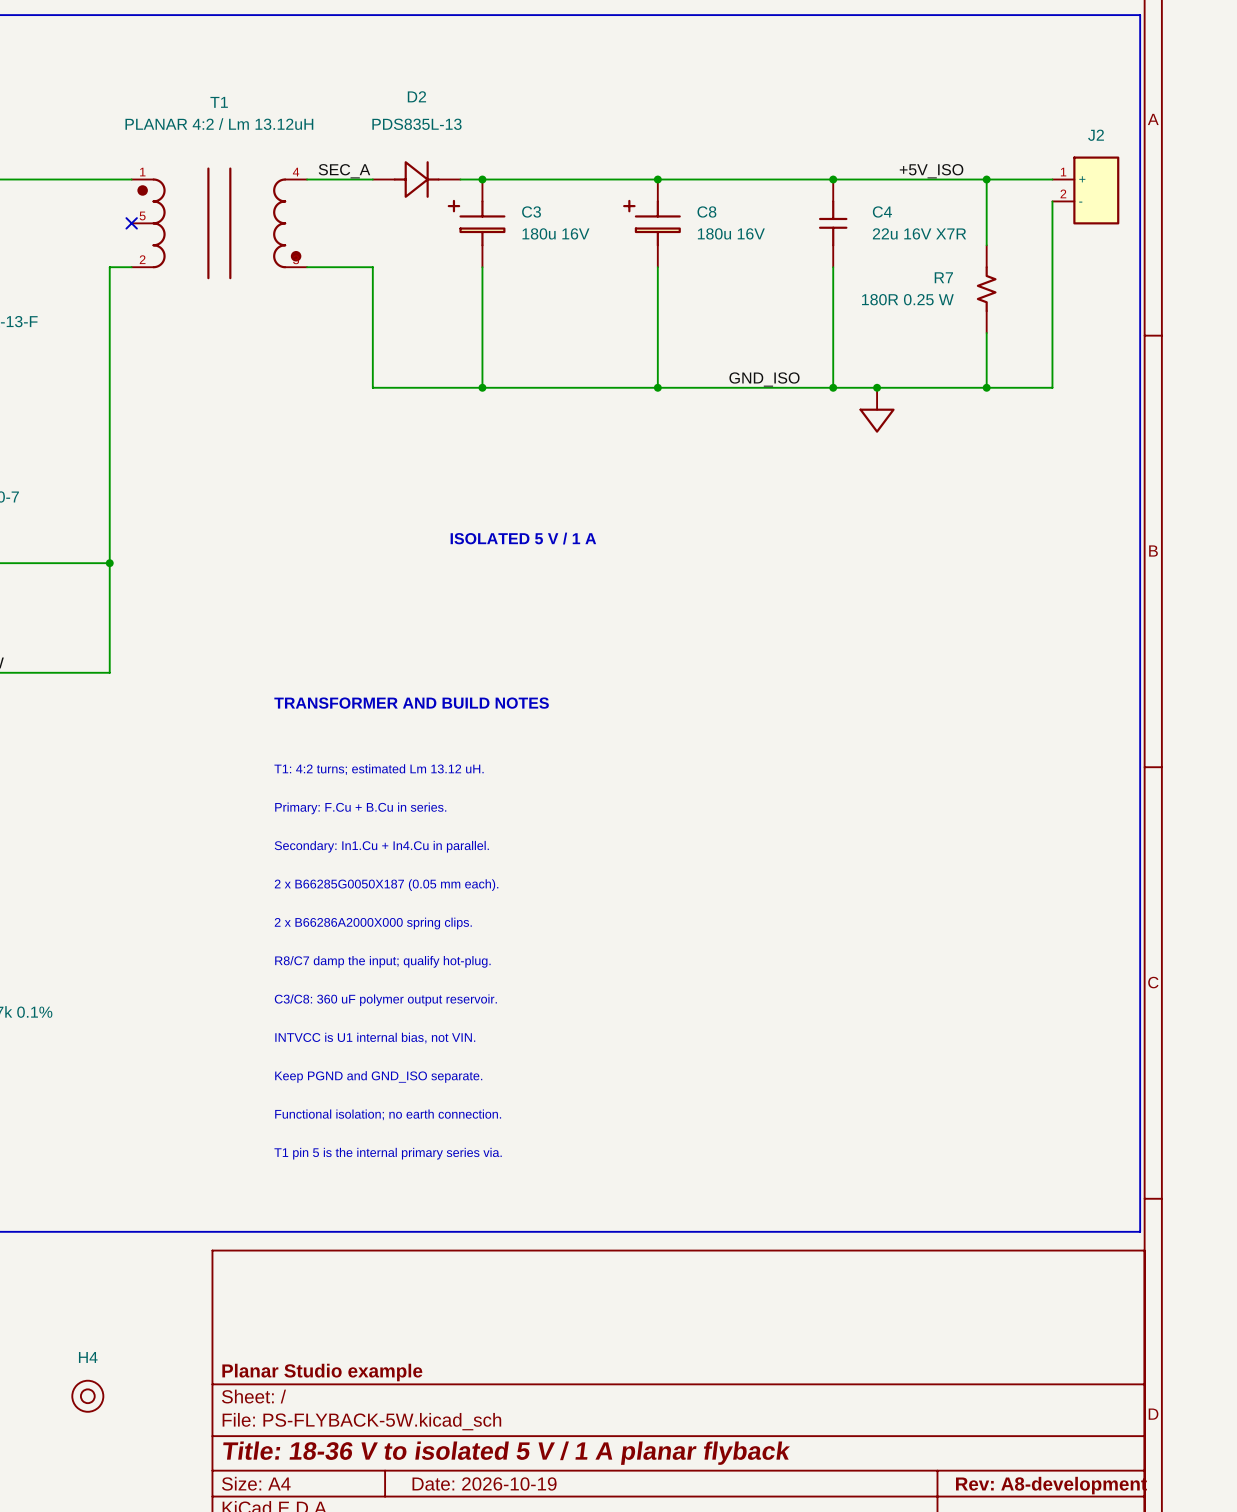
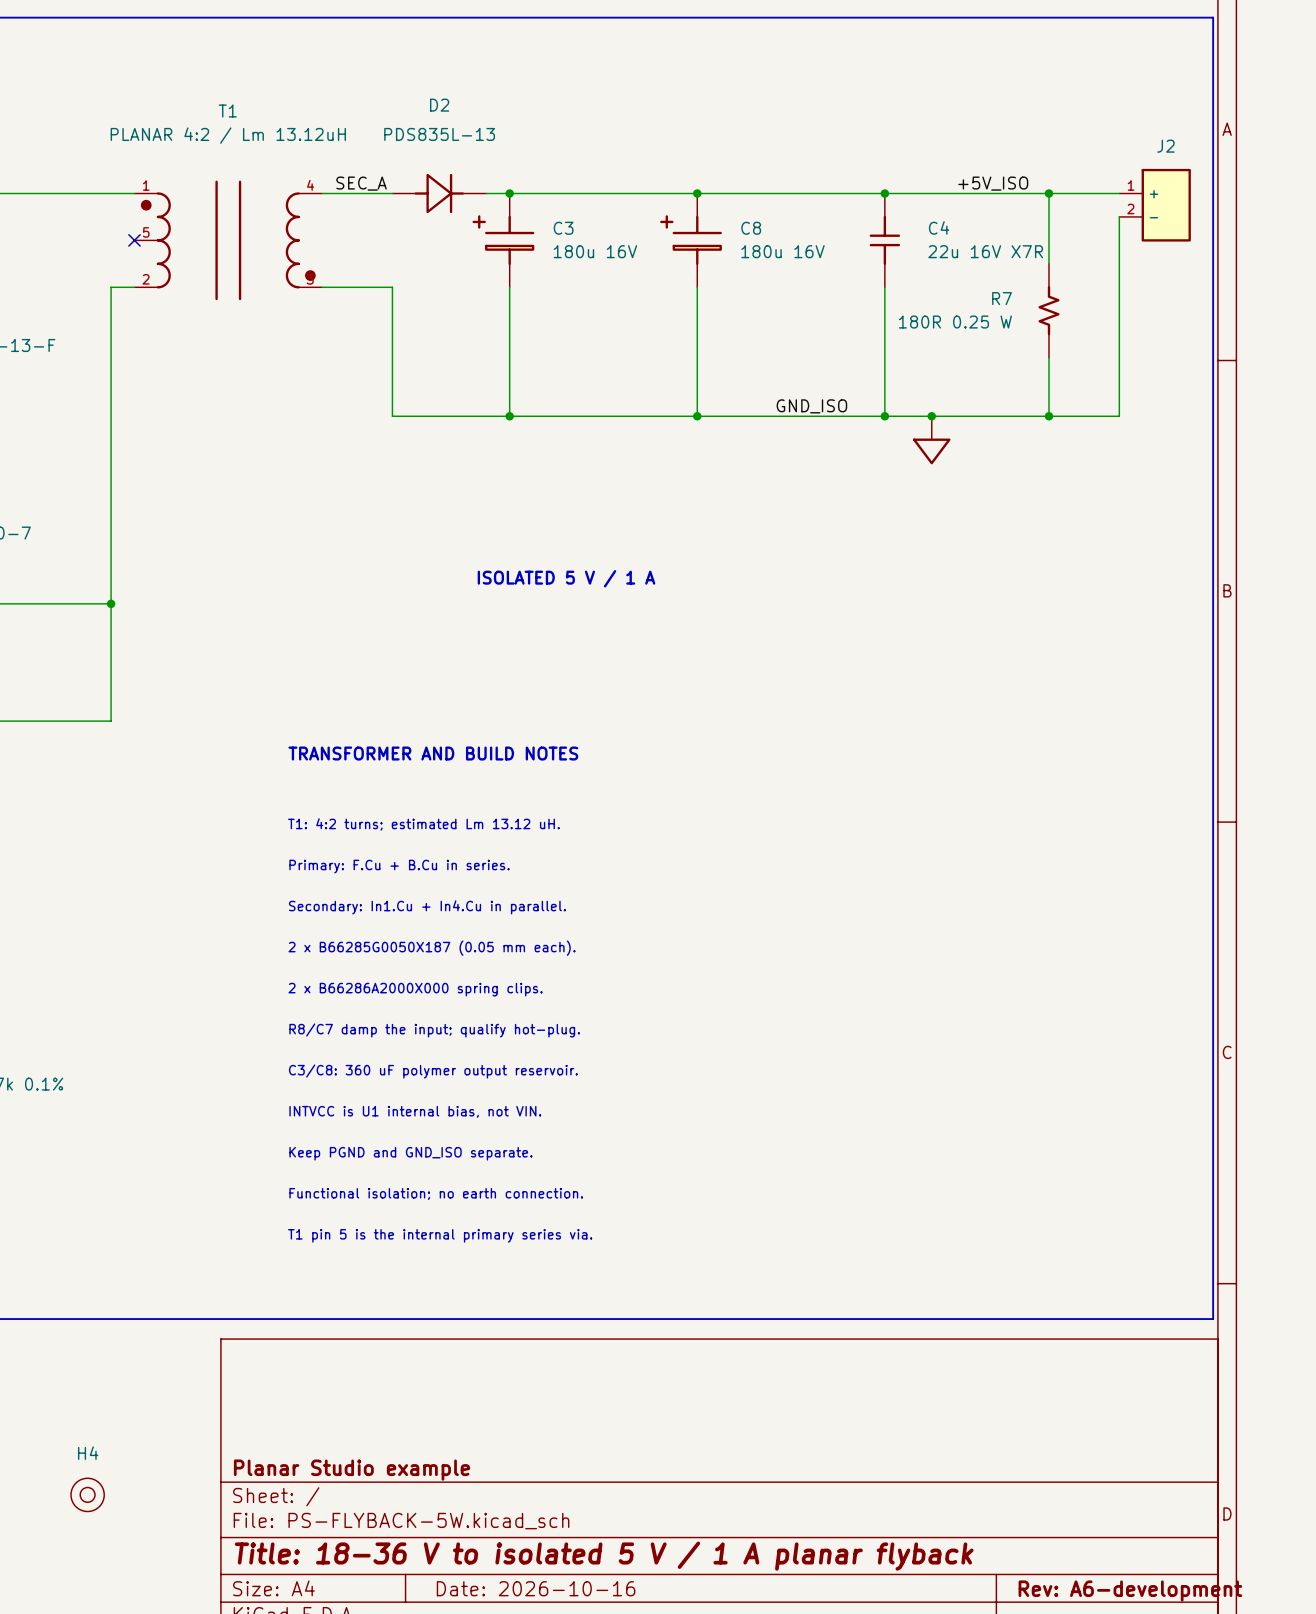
title block: Date: 2026-10-19 (484, 1483) -> Date: 2026-10-16 (536, 1588)
title block: Rev: A8-development (1051, 1485) -> Rev: A6-development (1130, 1591)

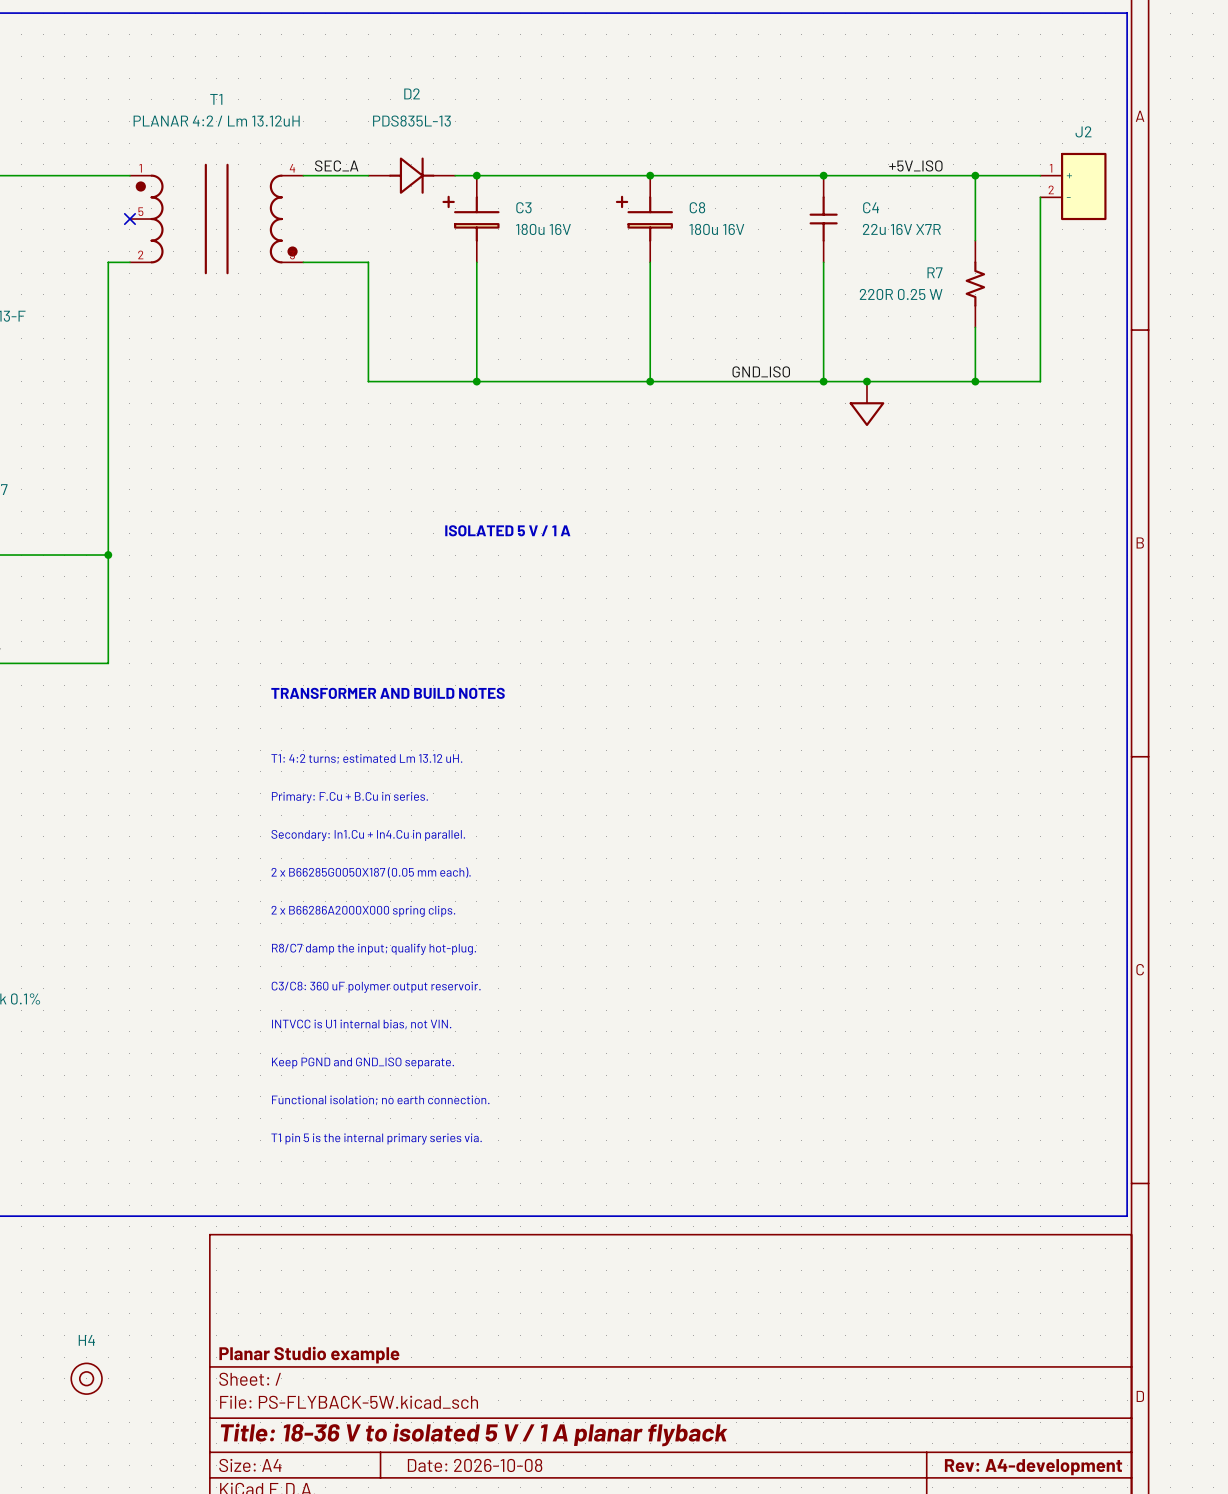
R7 value: 180R 0.25 W (955, 322) -> 220R 0.25 W (901, 294)
title block: Date: 2026-10-16 (536, 1588) -> Date: 2026-10-08 (475, 1465)
title block: Rev: A6-development (1130, 1591) -> Rev: A4-development (1033, 1467)

